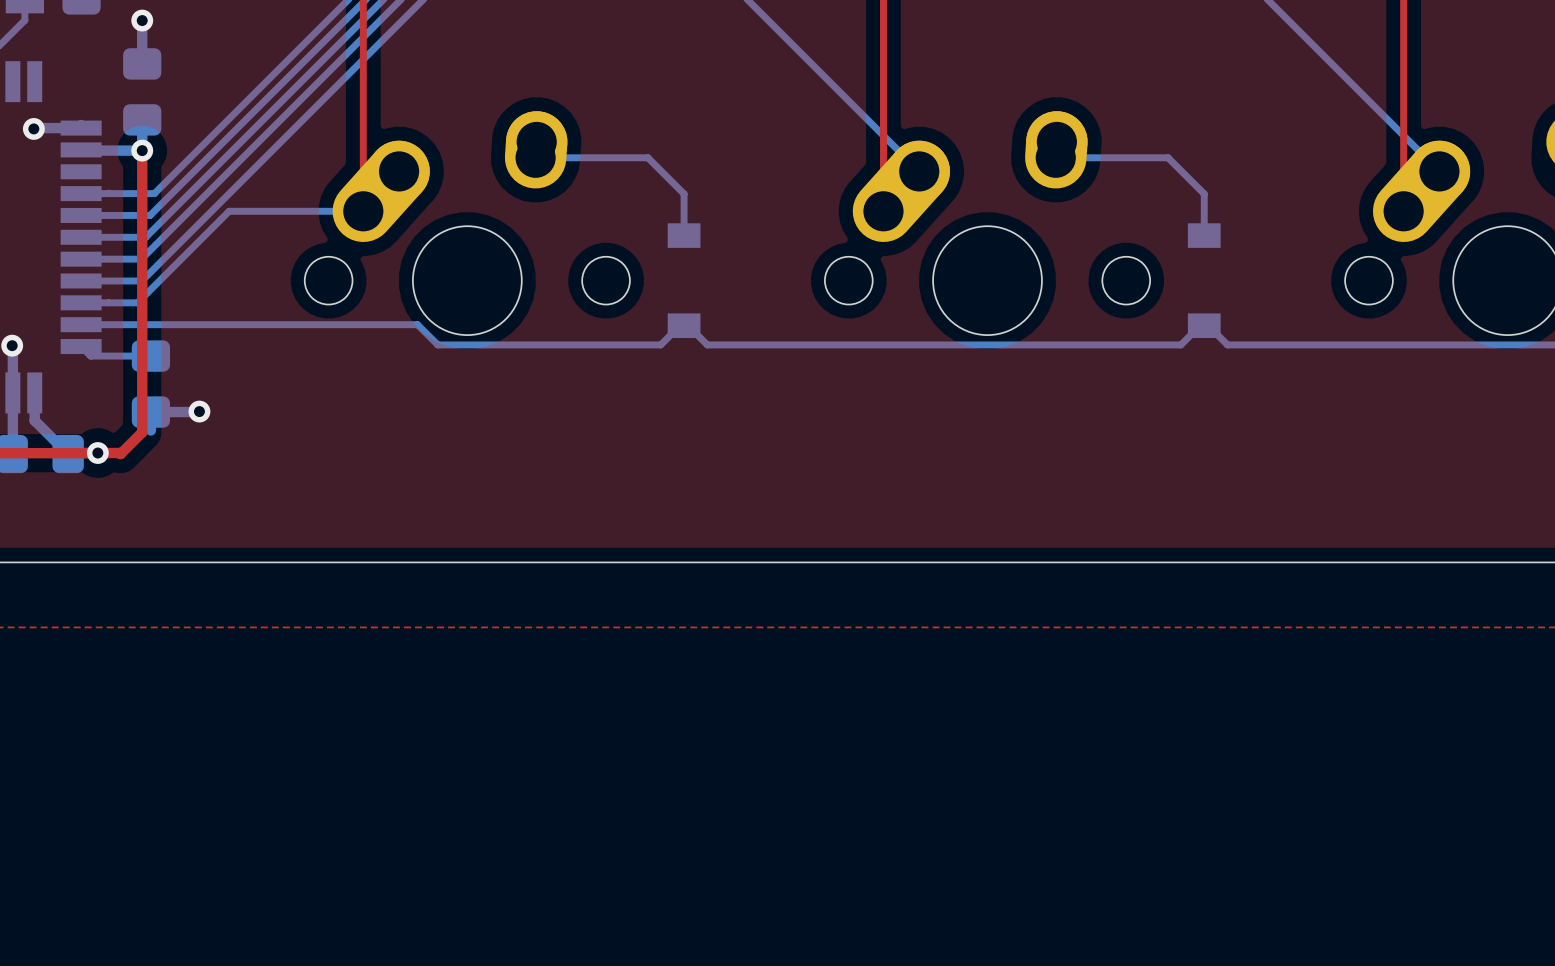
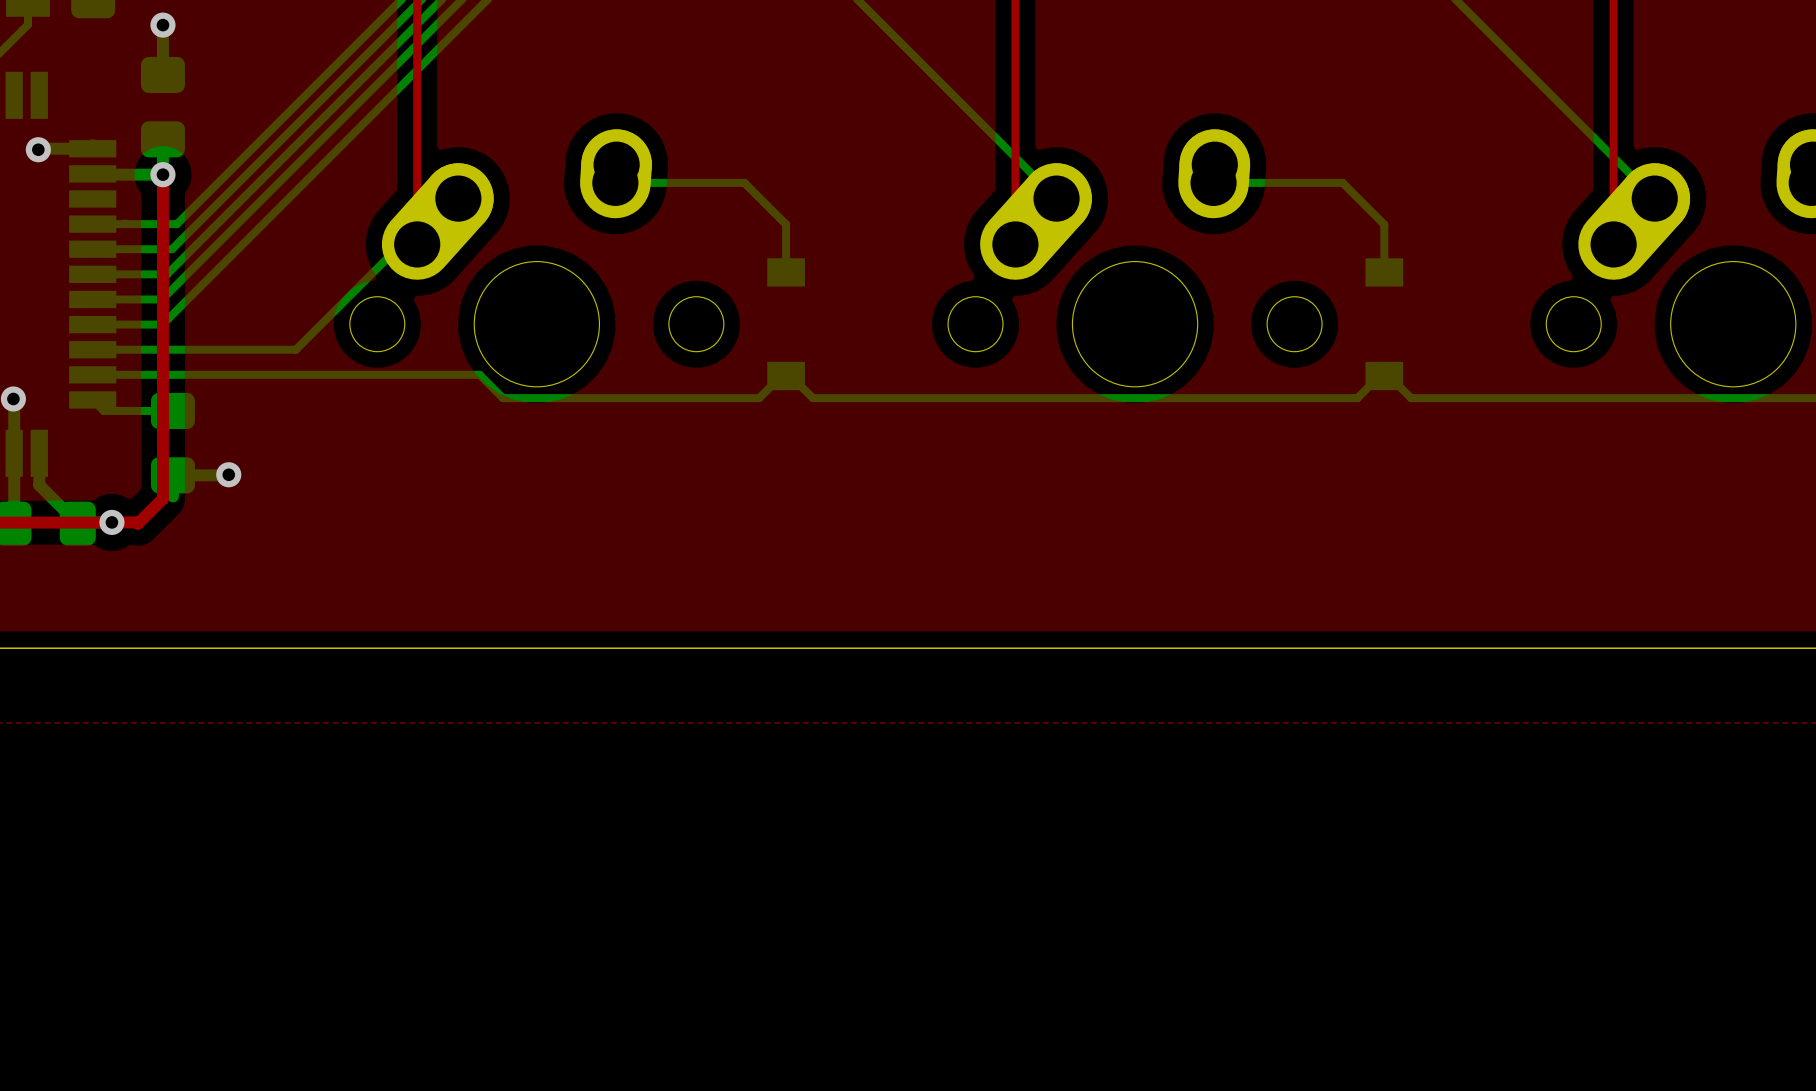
bottom track: (349, 211) (229, 211) (137, 302) -> (401, 244) (295, 349) (157, 349)

